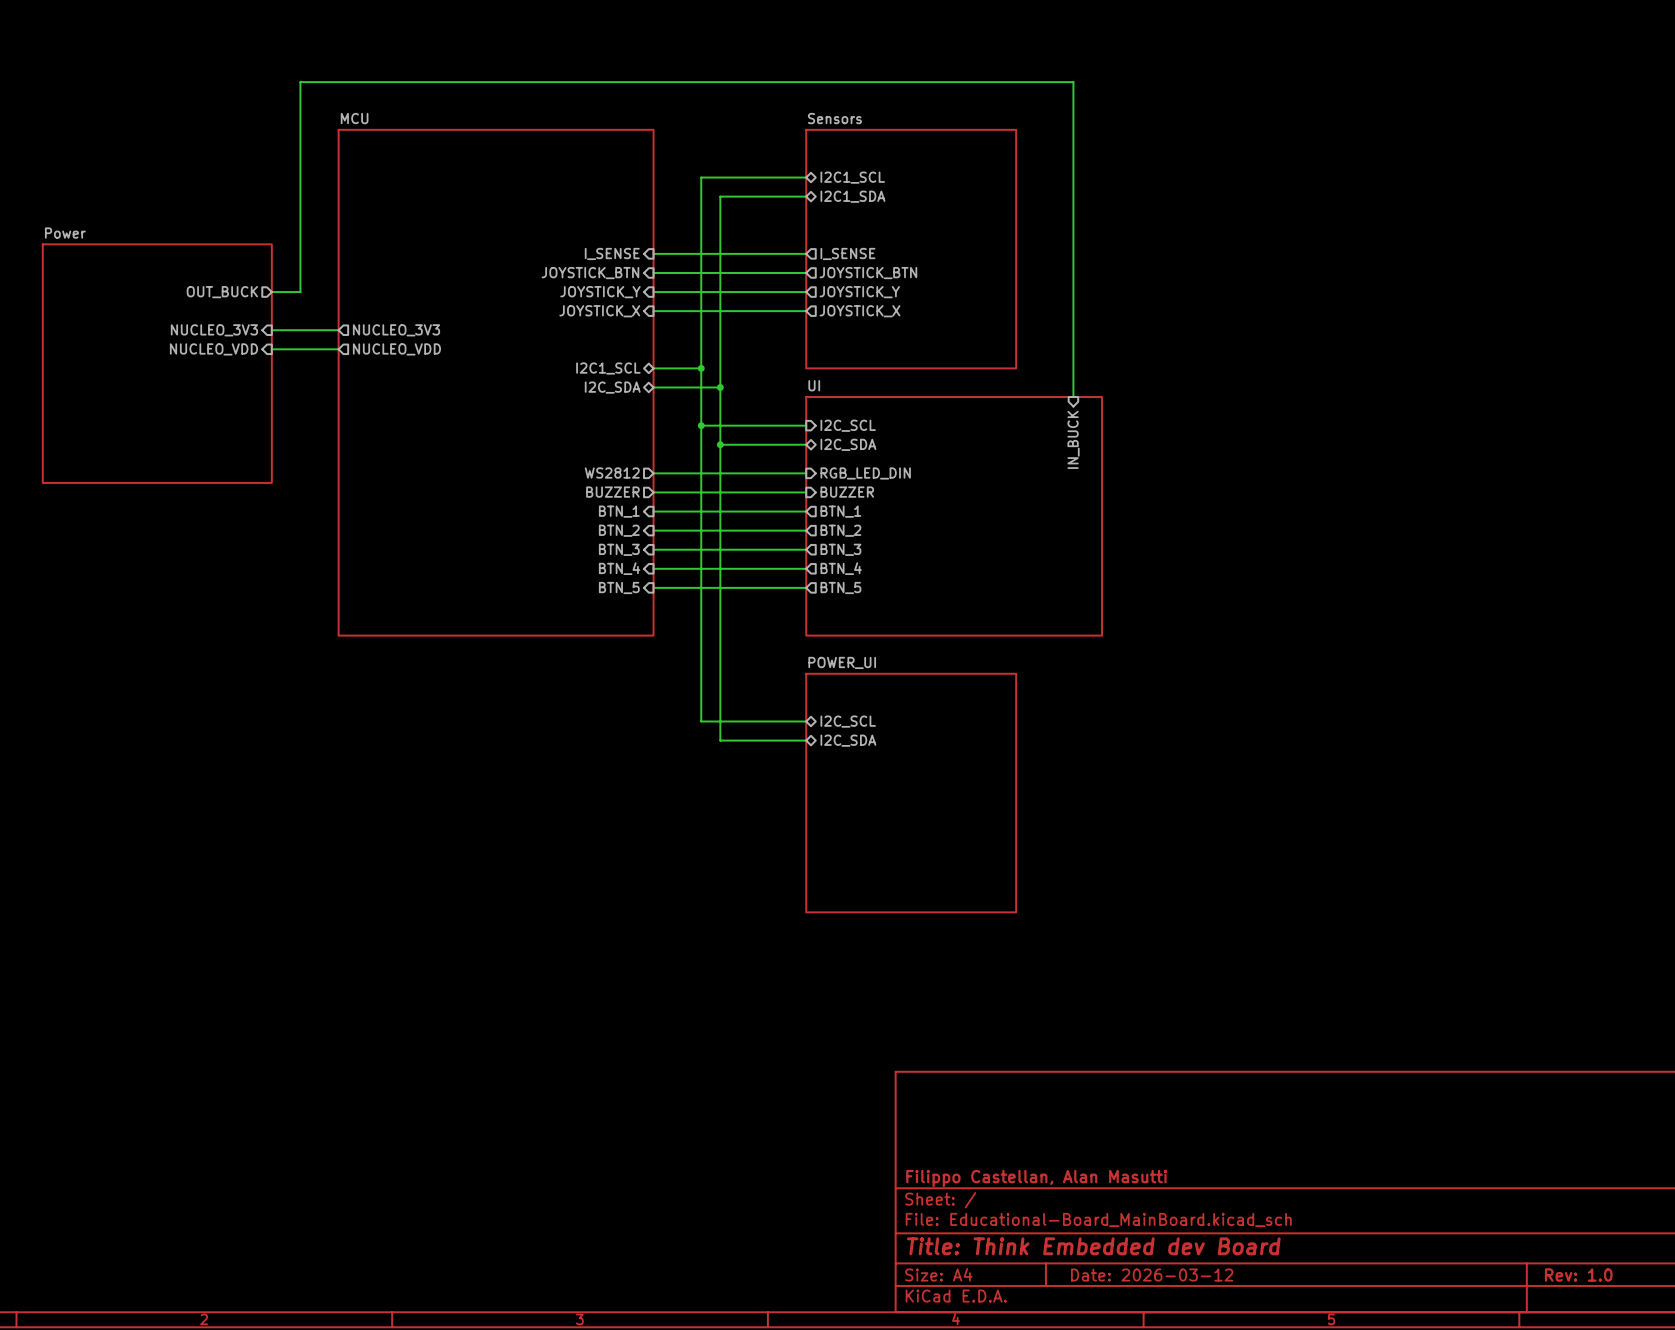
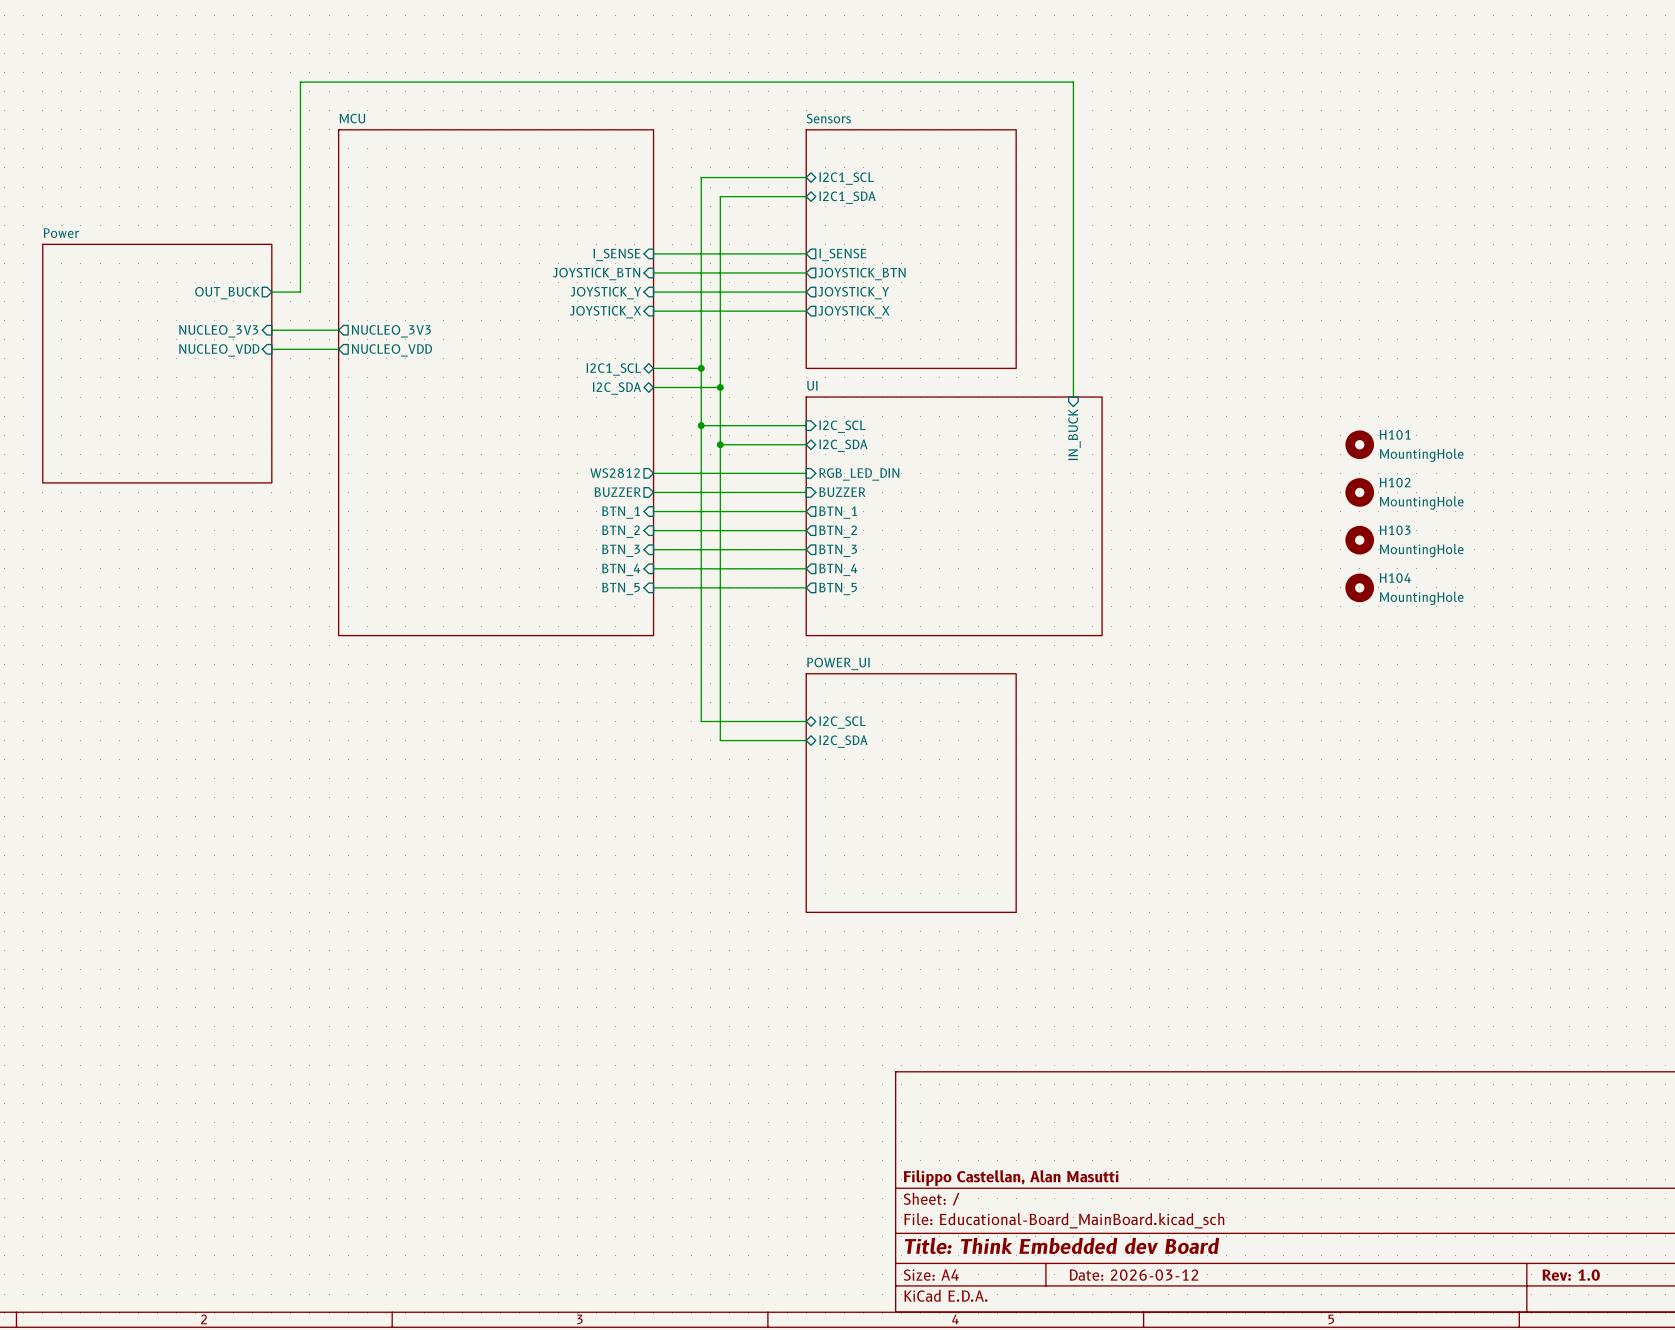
H101: none -> MountingHole (1359, 444)
H102: none -> MountingHole (1359, 492)
H103: none -> MountingHole (1359, 540)
H104: none -> MountingHole (1359, 587)

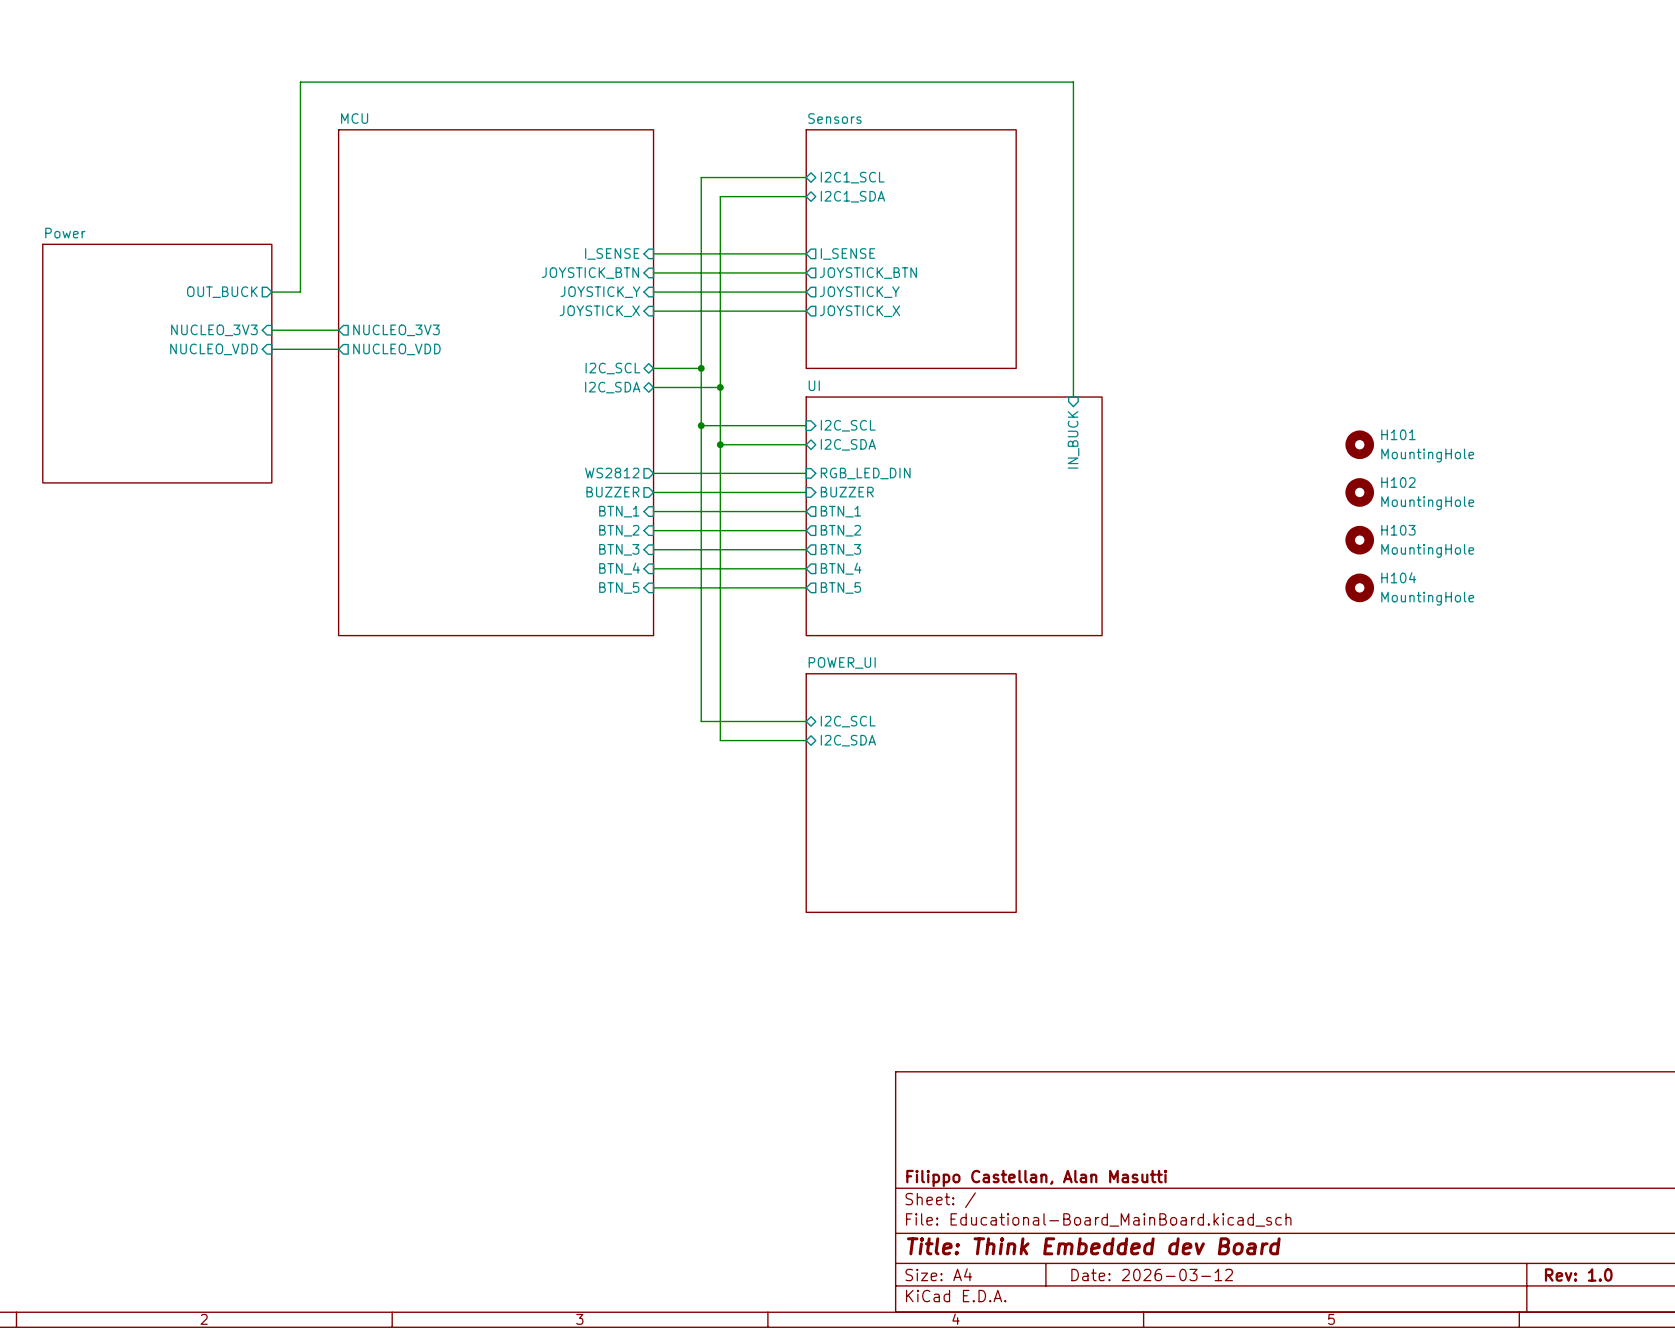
sheet pin: I2C1_SCL (613, 369) -> I2C_SCL (612, 368)

